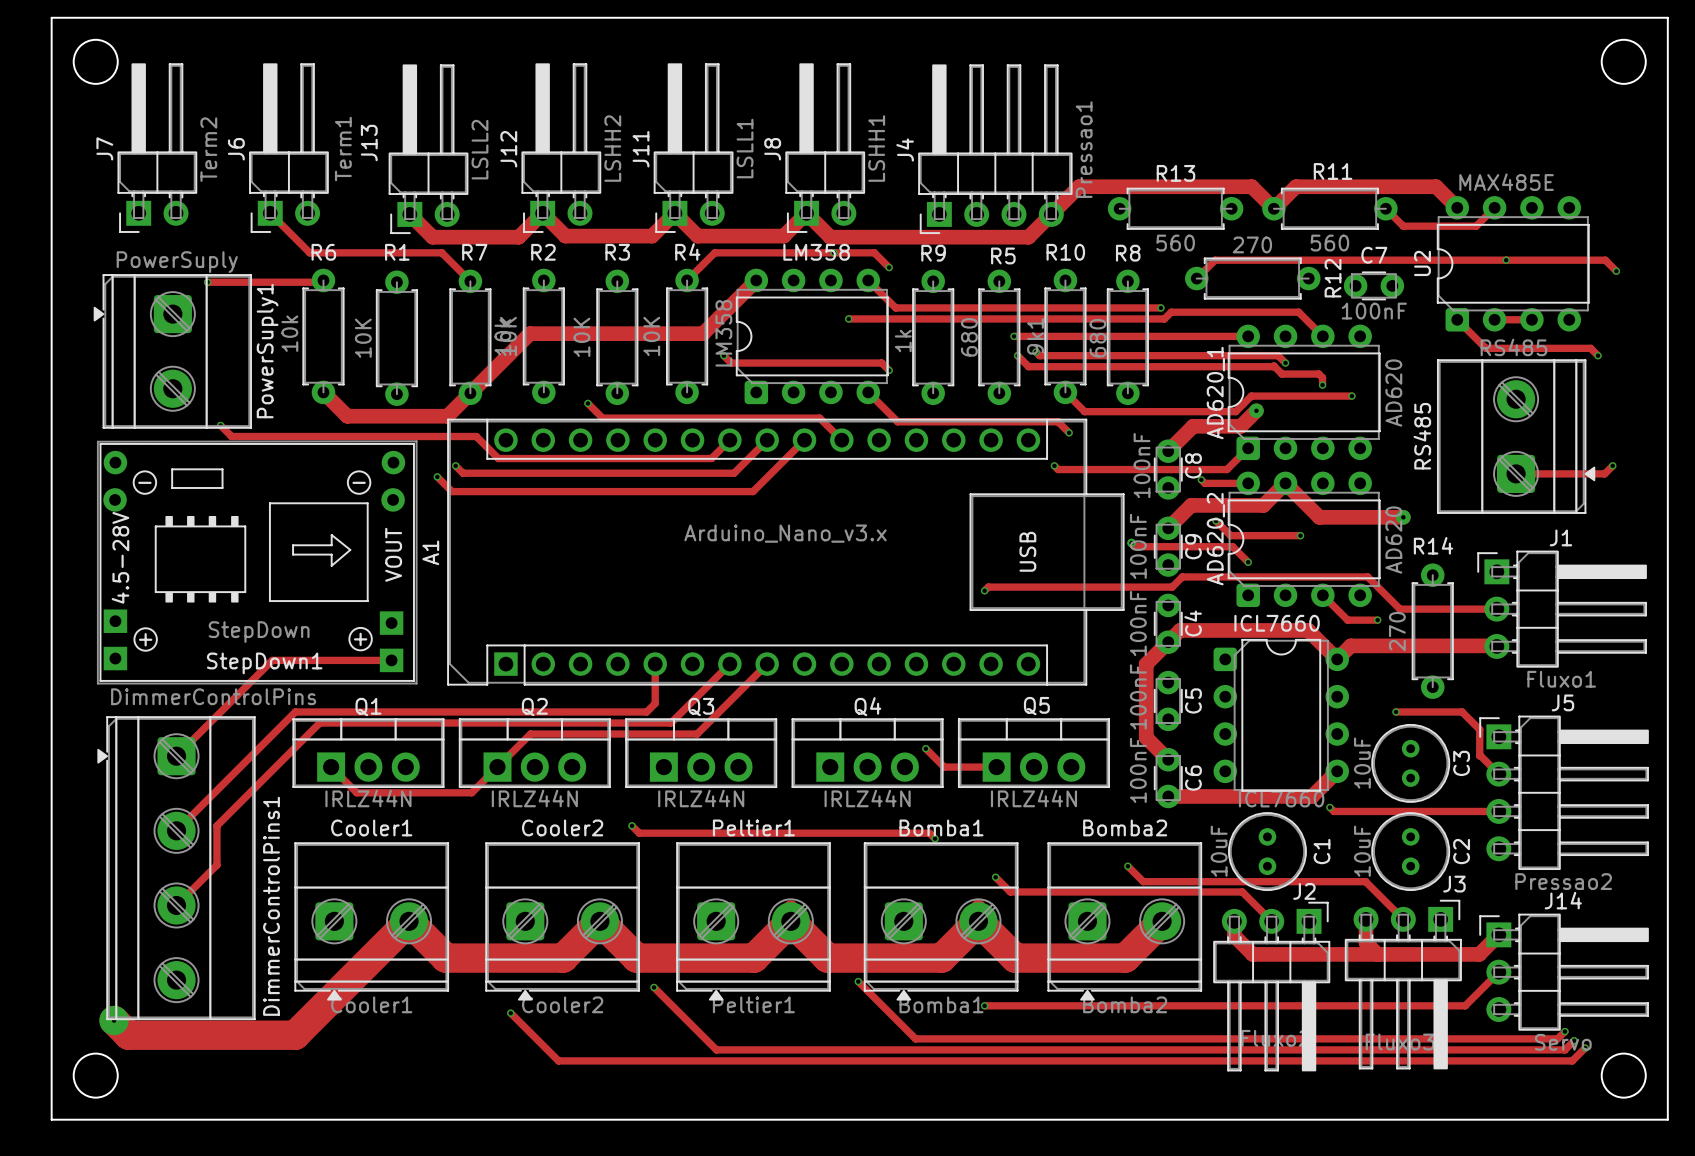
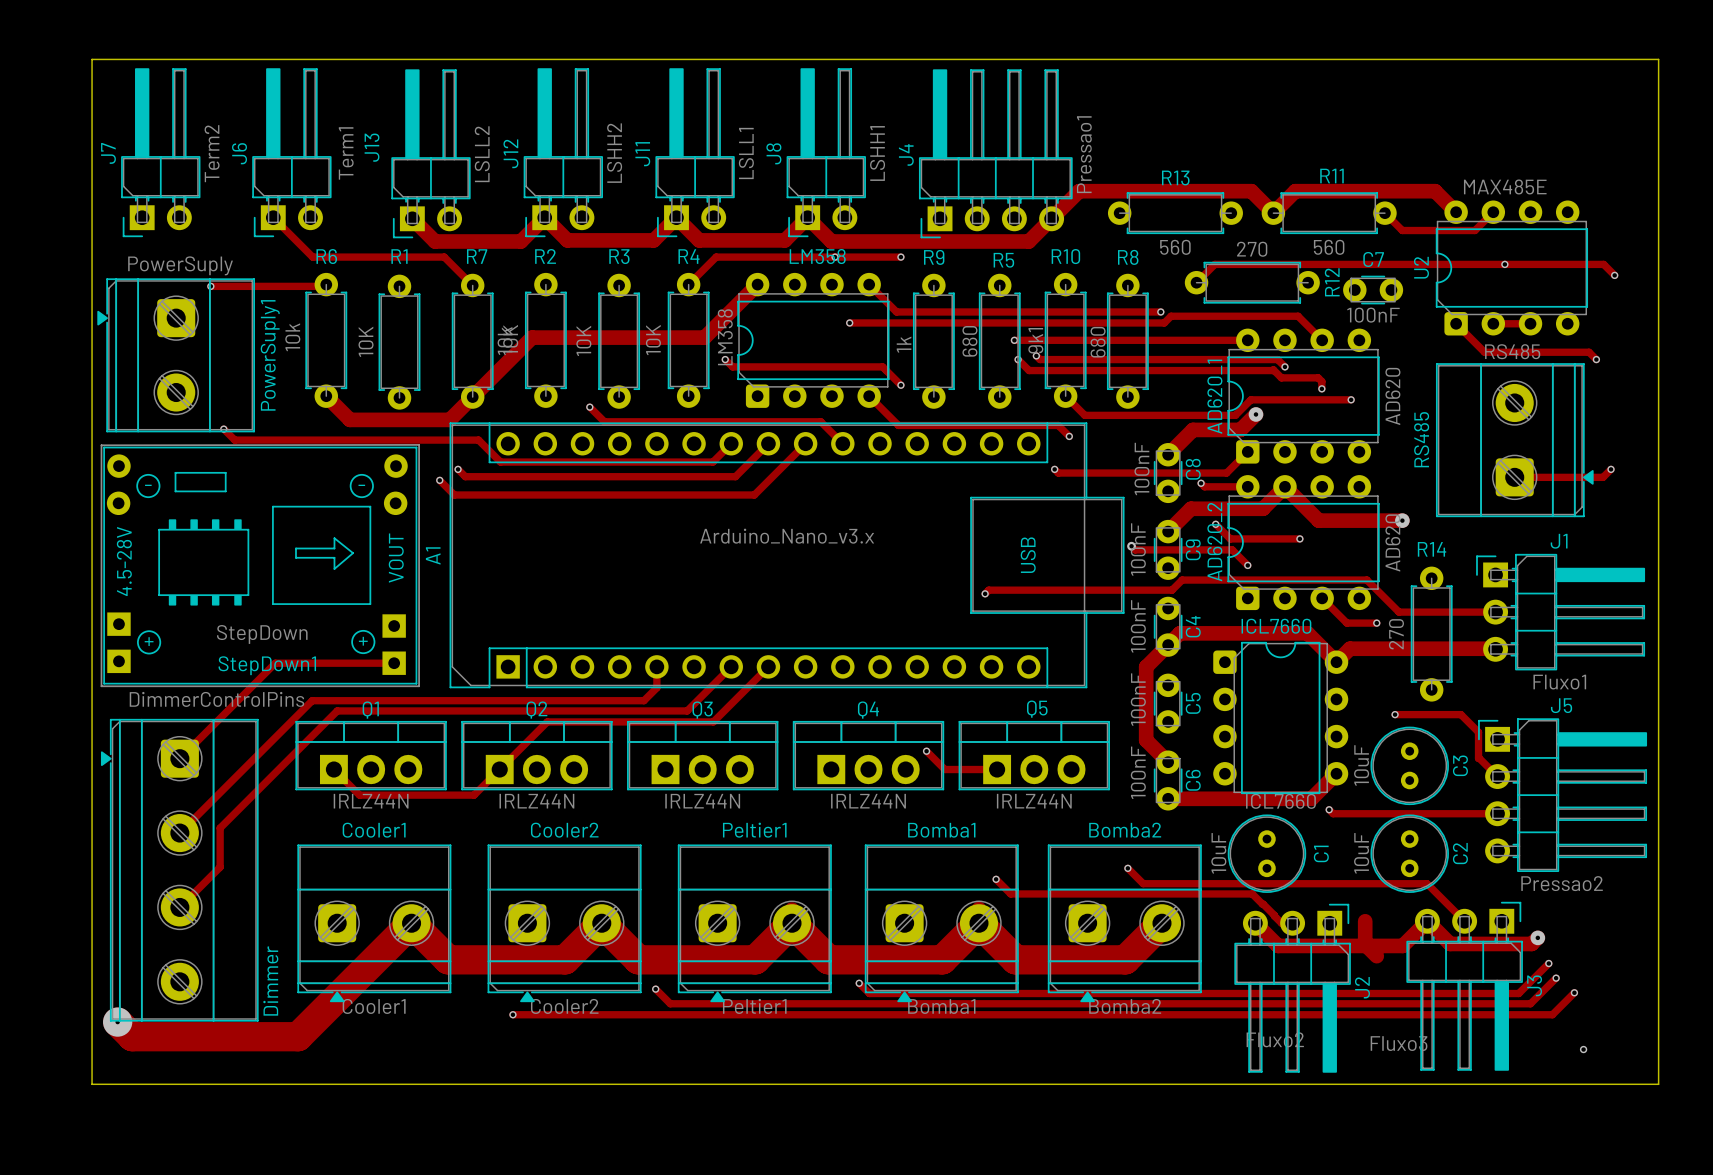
board edge: (51, 17) (1667, 17) (1667, 1119) (51, 1119) (51, 17) -> (92, 59) (92, 1084) (1658, 1084) (1658, 59) (92, 59)
round board edge: [73, 39, 119, 85] -> none
round board edge: [1601, 39, 1647, 85] -> none
track: (874, 252) (889, 267) -> (875, 257) (900, 257)
via position: (889, 267) -> (900, 257)
track: none -> (889, 374) (900, 385)
via position: (889, 370) -> (900, 385)
track: (655, 685) (655, 703) (646, 711) (295, 711) -> (656, 687) (643, 700) (312, 700) (298, 714)
track: (685, 708) (670, 723) (319, 723) -> (687, 710) (337, 710) (322, 725)
track: (711, 719) (697, 734) (530, 734) -> (713, 721) (547, 721) (532, 736)
track: (632, 825) (639, 833) (929, 833) (935, 838) -> none
via: (632, 825) -> none
via: (935, 838) -> none
track: (1365, 881) (1403, 919) -> (1364, 883) (1427, 883) (1464, 921)
J3 name rotation: 0° (1454, 884) -> 90° counterclockwise (1534, 985)
J3 name position: J3 (1454, 884) -> J3 (1534, 985)
track: (1242, 891) (1271, 921) -> (1241, 893) (1252, 893) (1281, 923) (1292, 923)
J2 name rotation: 0° (1304, 891) -> 90° counterclockwise (1362, 987)
J2 name position: J2 (1304, 891) -> J2 (1362, 987)
DimmerControlPins1 name: DimmerControlPins1 (271, 906) -> Dimmer (270, 980)
track: (1234, 921) (1234, 936) (1252, 954) (1479, 954) (1498, 934) -> none
track: none -> (1255, 923) (1278, 945) (1402, 945) (1427, 921) (1450, 943) (1531, 943) (1537, 937)
via: none -> (1537, 937)
via: none -> (1548, 963)
track: (1498, 972) (1465, 1005) (984, 1005) -> none
J14: Servo (1564, 972) -> none
via: none -> (1556, 978)
J3 position: (1403, 984) -> (1464, 986)
J2 position: (1271, 986) -> (1292, 988)
track: (868, 991) (915, 1038) (1557, 1038) (1564, 1031) -> (869, 993) (1518, 993) (1548, 963)
via: none -> (1574, 992)
track: (668, 1002) (716, 1049) (1564, 1049) (1574, 1040) -> (670, 1003) (1530, 1003) (1556, 978)
via: (984, 1005) -> none
track: (510, 1013) (558, 1060) (1572, 1060) (1585, 1048) -> (512, 1014) (1552, 1014) (1574, 992)
via: (1564, 1031) -> none
via: (1574, 1040) -> none
round board edge: [73, 1053, 119, 1099] -> none
round board edge: [1601, 1053, 1647, 1099] -> none

